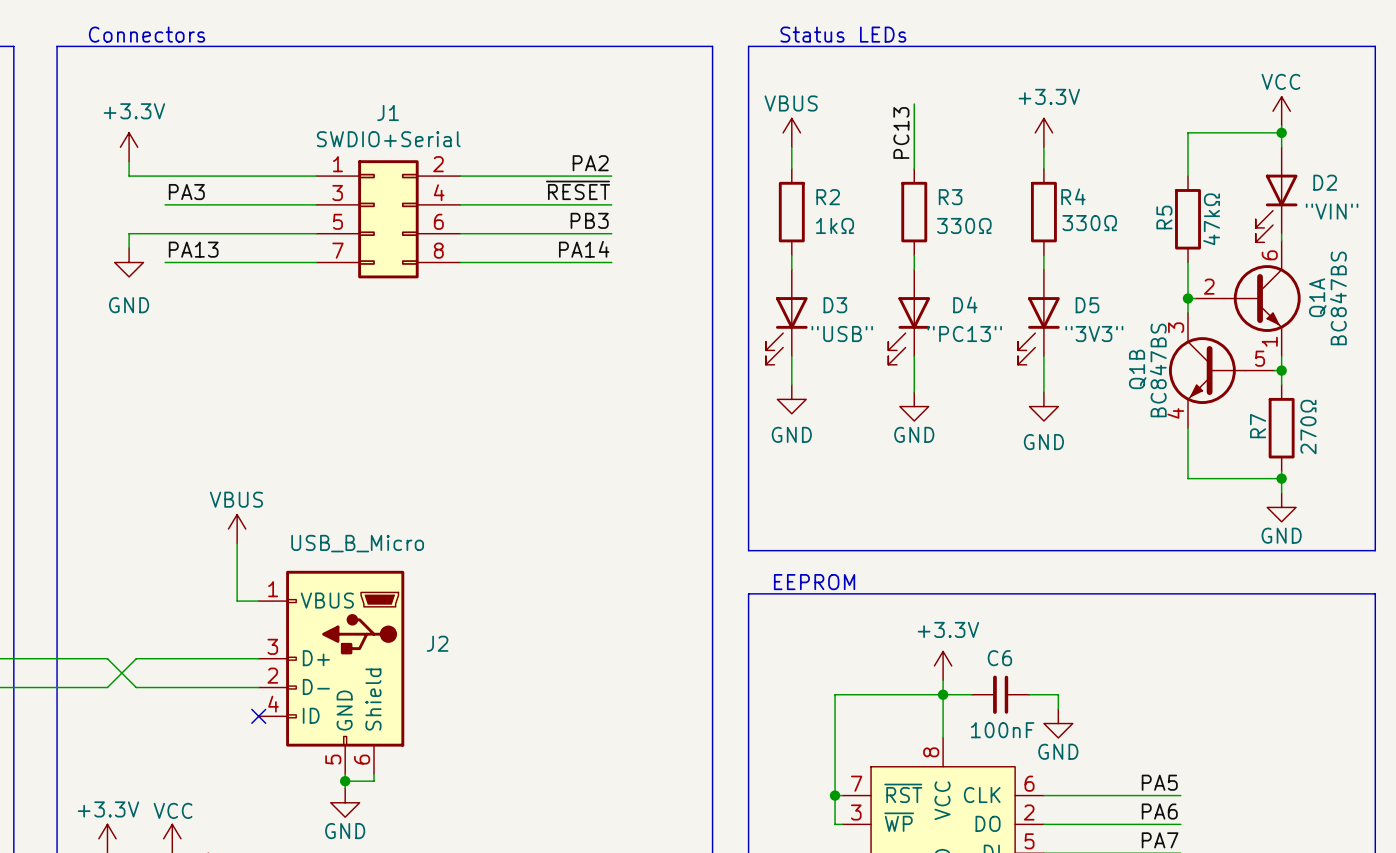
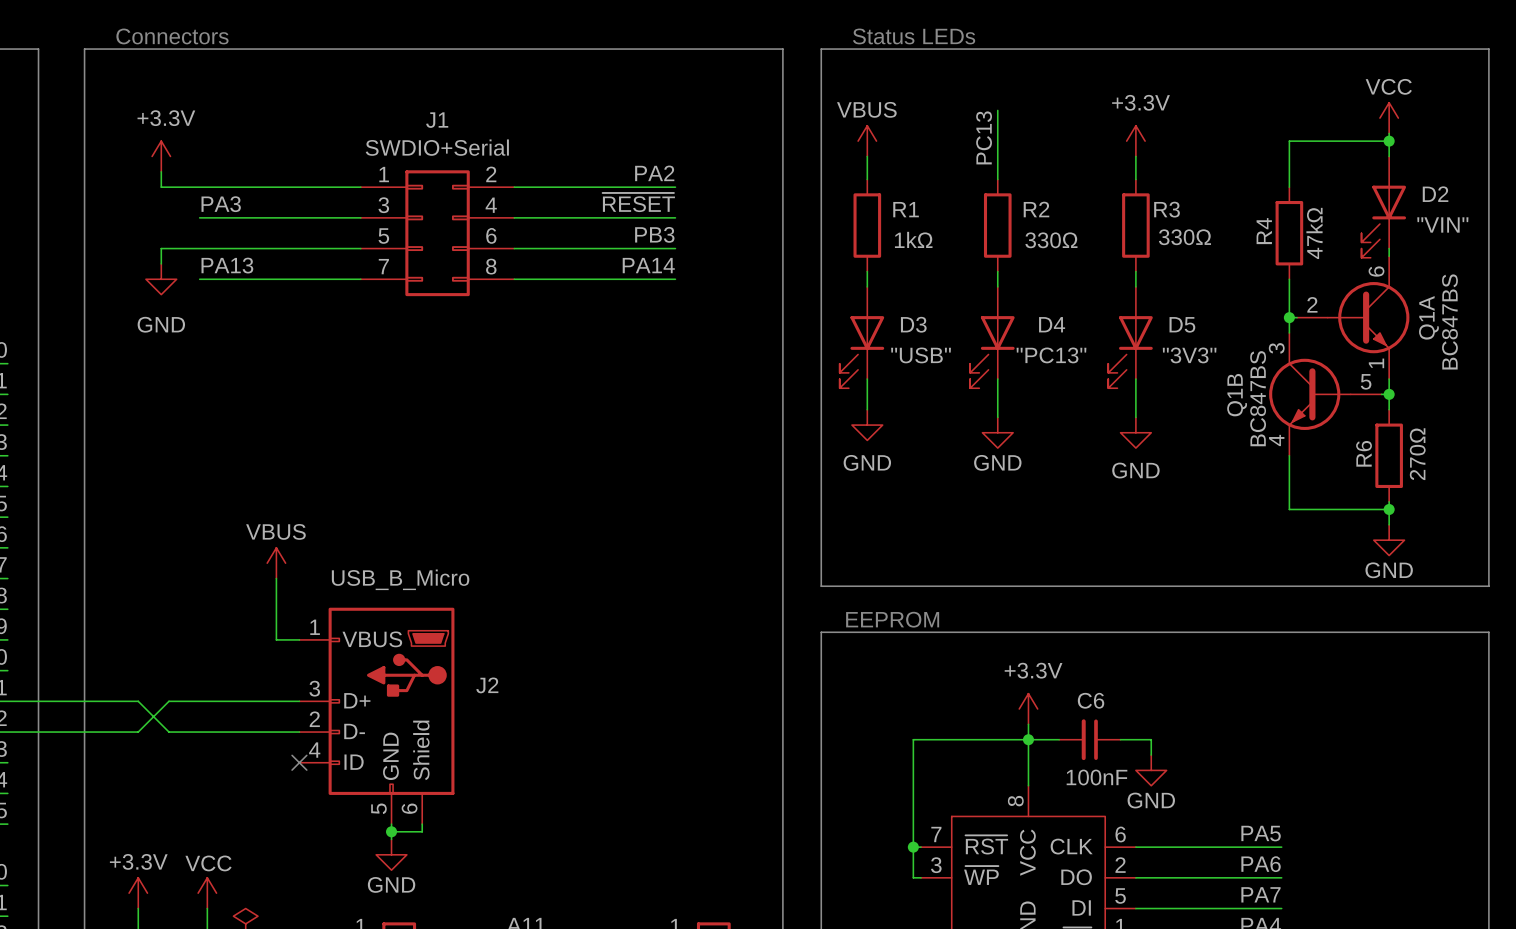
R4 name: R4 (1073, 196) -> R3 (1167, 209)
R2 name: R2 (828, 197) -> R1 (906, 209)
R3 name: R3 (950, 197) -> R2 (1036, 209)
R5 name: R5 (1164, 217) -> R4 (1264, 231)
R7 name: R7 (1258, 426) -> R6 (1364, 453)

